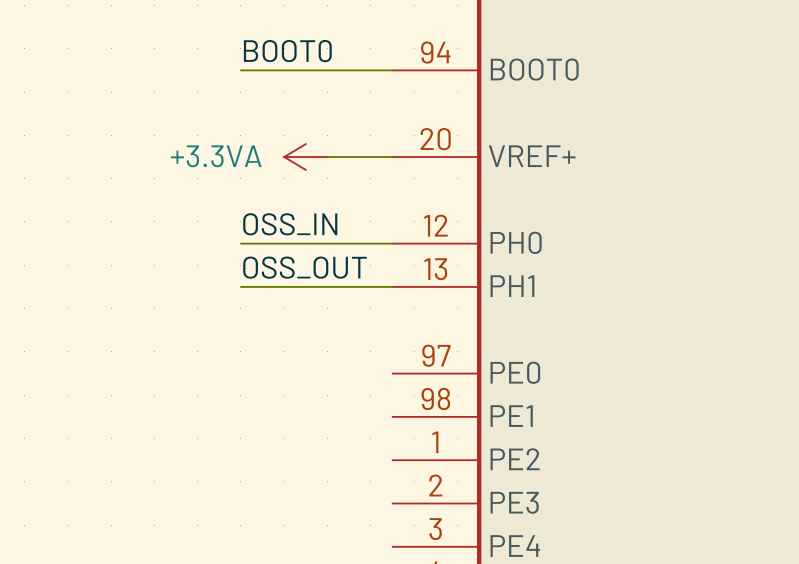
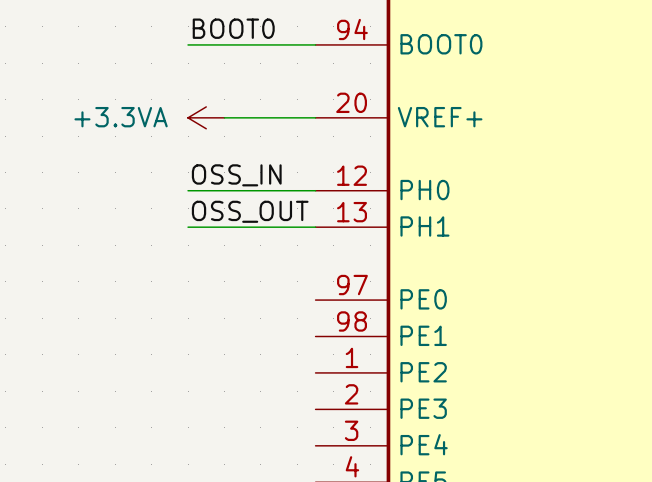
power symbol position: +3.3VA (305, 157) -> +3.3VA (206, 117)

